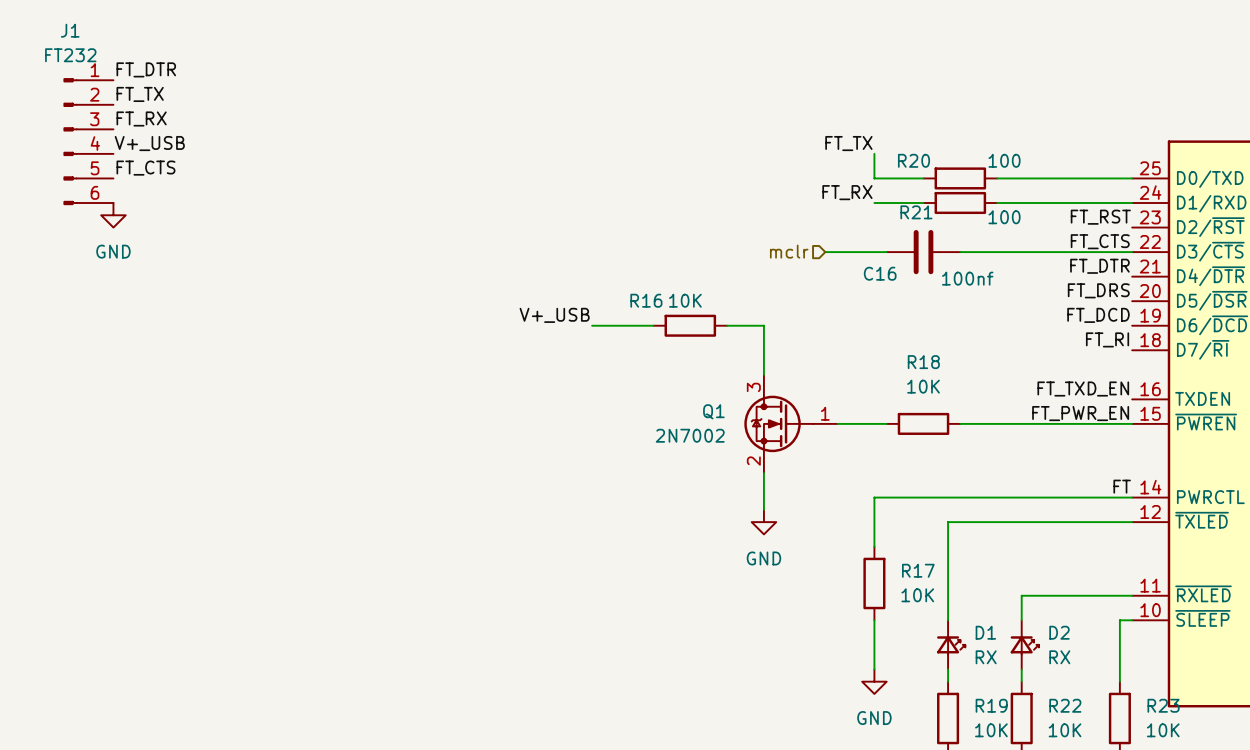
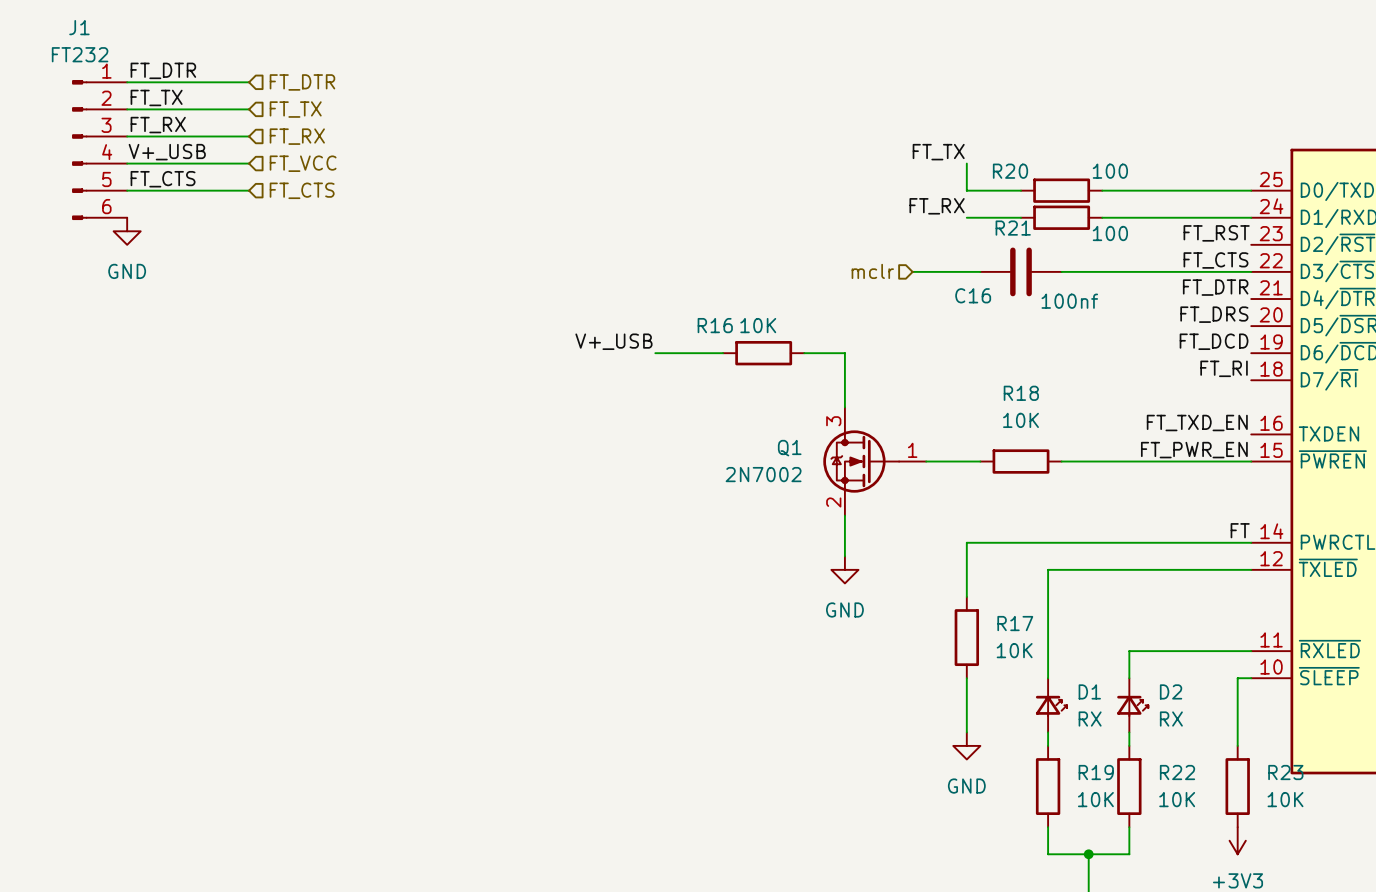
wire: none -> (127, 82) (249, 82)
hierarchical label: none -> FT_DTR (302, 82)
wire: none -> (127, 109) (249, 109)
hierarchical label: none -> FT_TX (295, 109)
wire: none -> (127, 136) (249, 136)
hierarchical label: none -> FT_RX (297, 136)
wire: none -> (127, 163) (249, 163)
hierarchical label: none -> FT_VCC (303, 163)
wire: none -> (127, 190) (249, 190)
hierarchical label: none -> FT_CTS (302, 190)

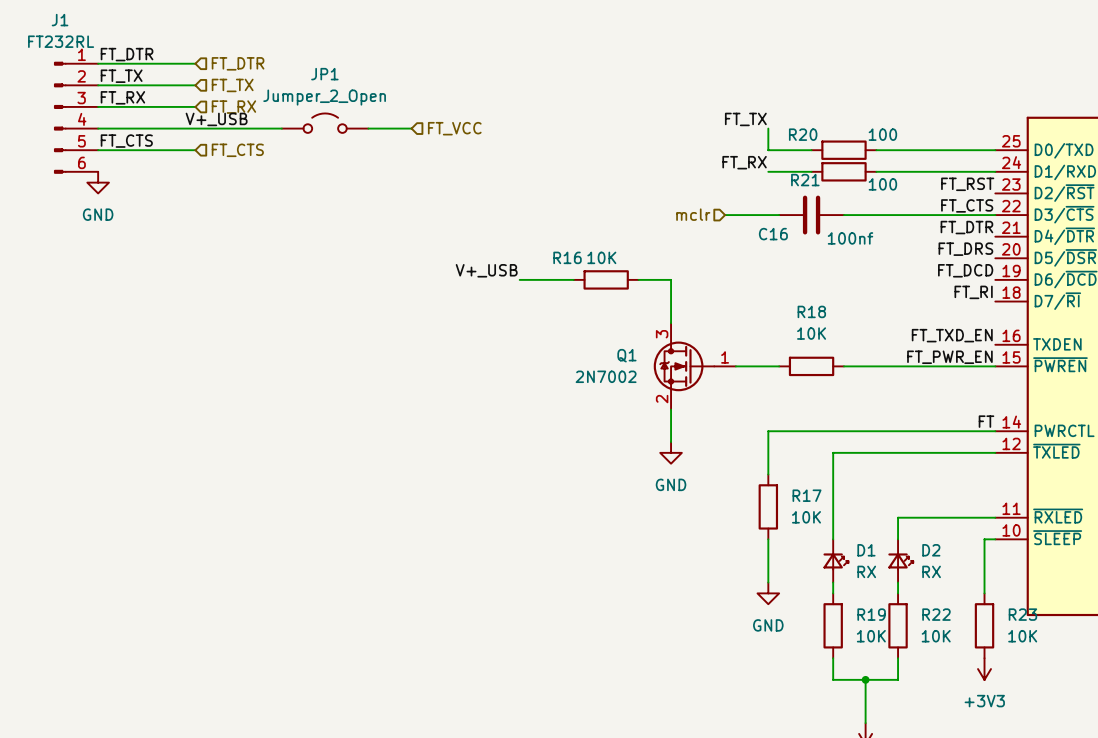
J1 value: FT232 (80, 54) -> FT232RL (61, 41)
label position: V+_USB (167, 152) -> V+_USB (216, 119)
JP1: none -> Jumper_2_Open (325, 123)
wire: none -> (195, 128) (281, 128)
hierarchical label: FT_VCC (303, 163) -> none
wire: none -> (368, 128) (411, 128)
hierarchical label: none -> FT_VCC (454, 128)

